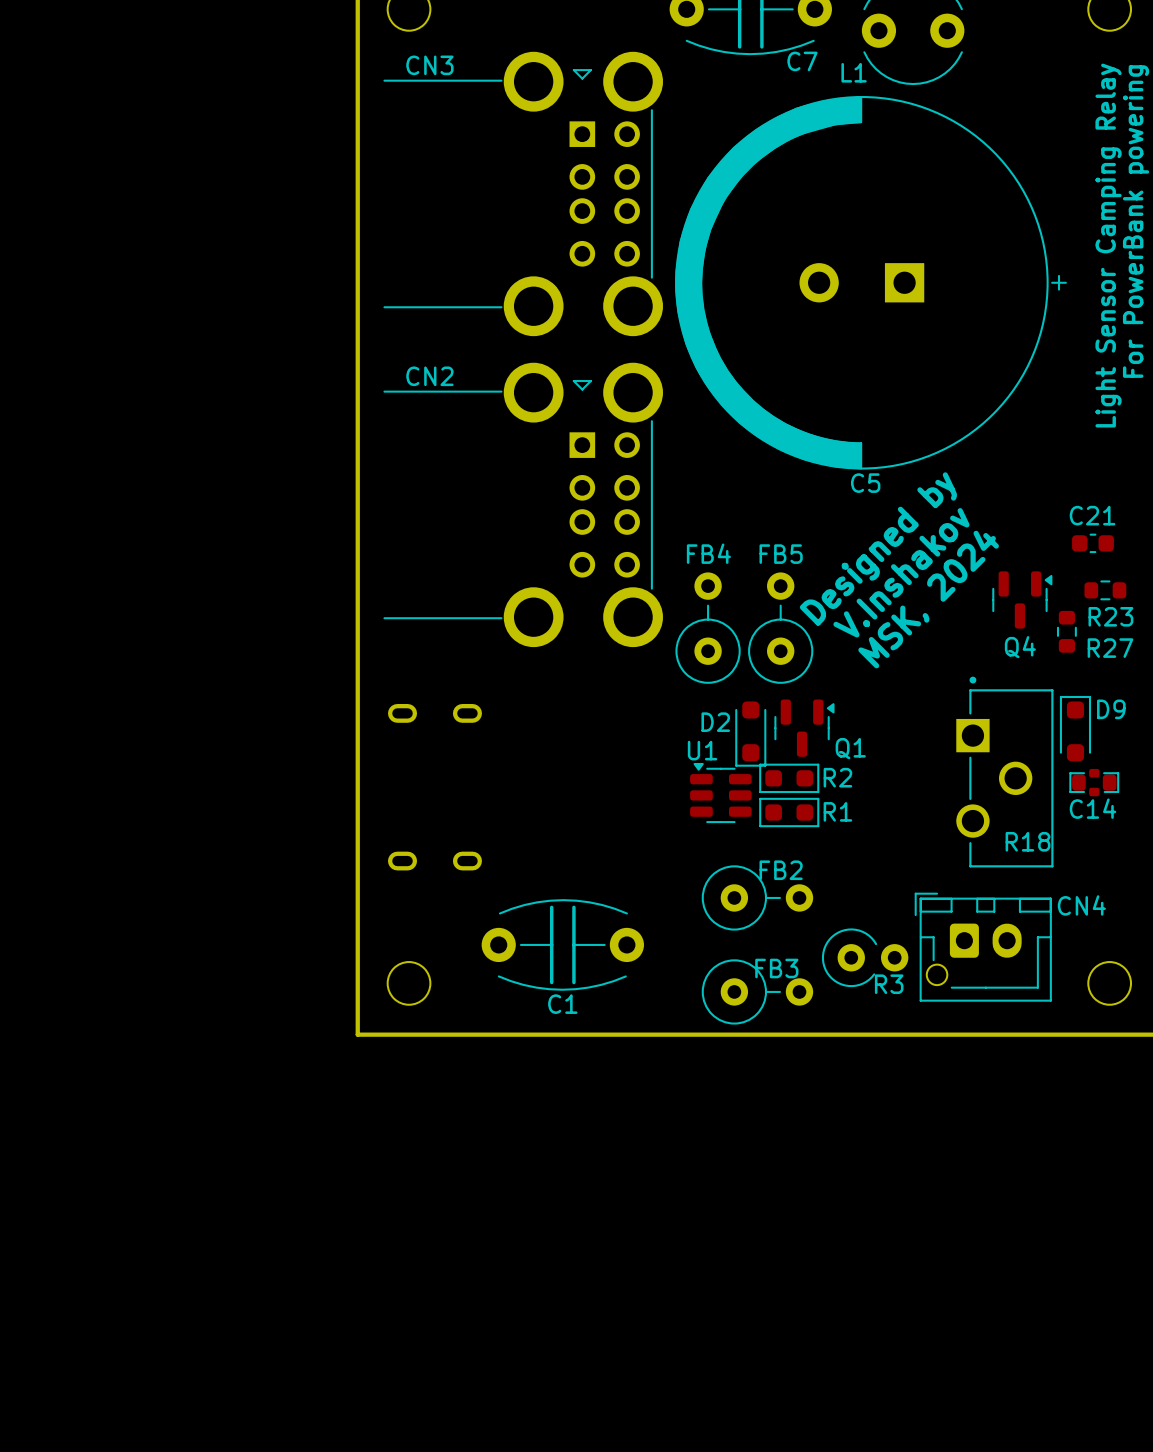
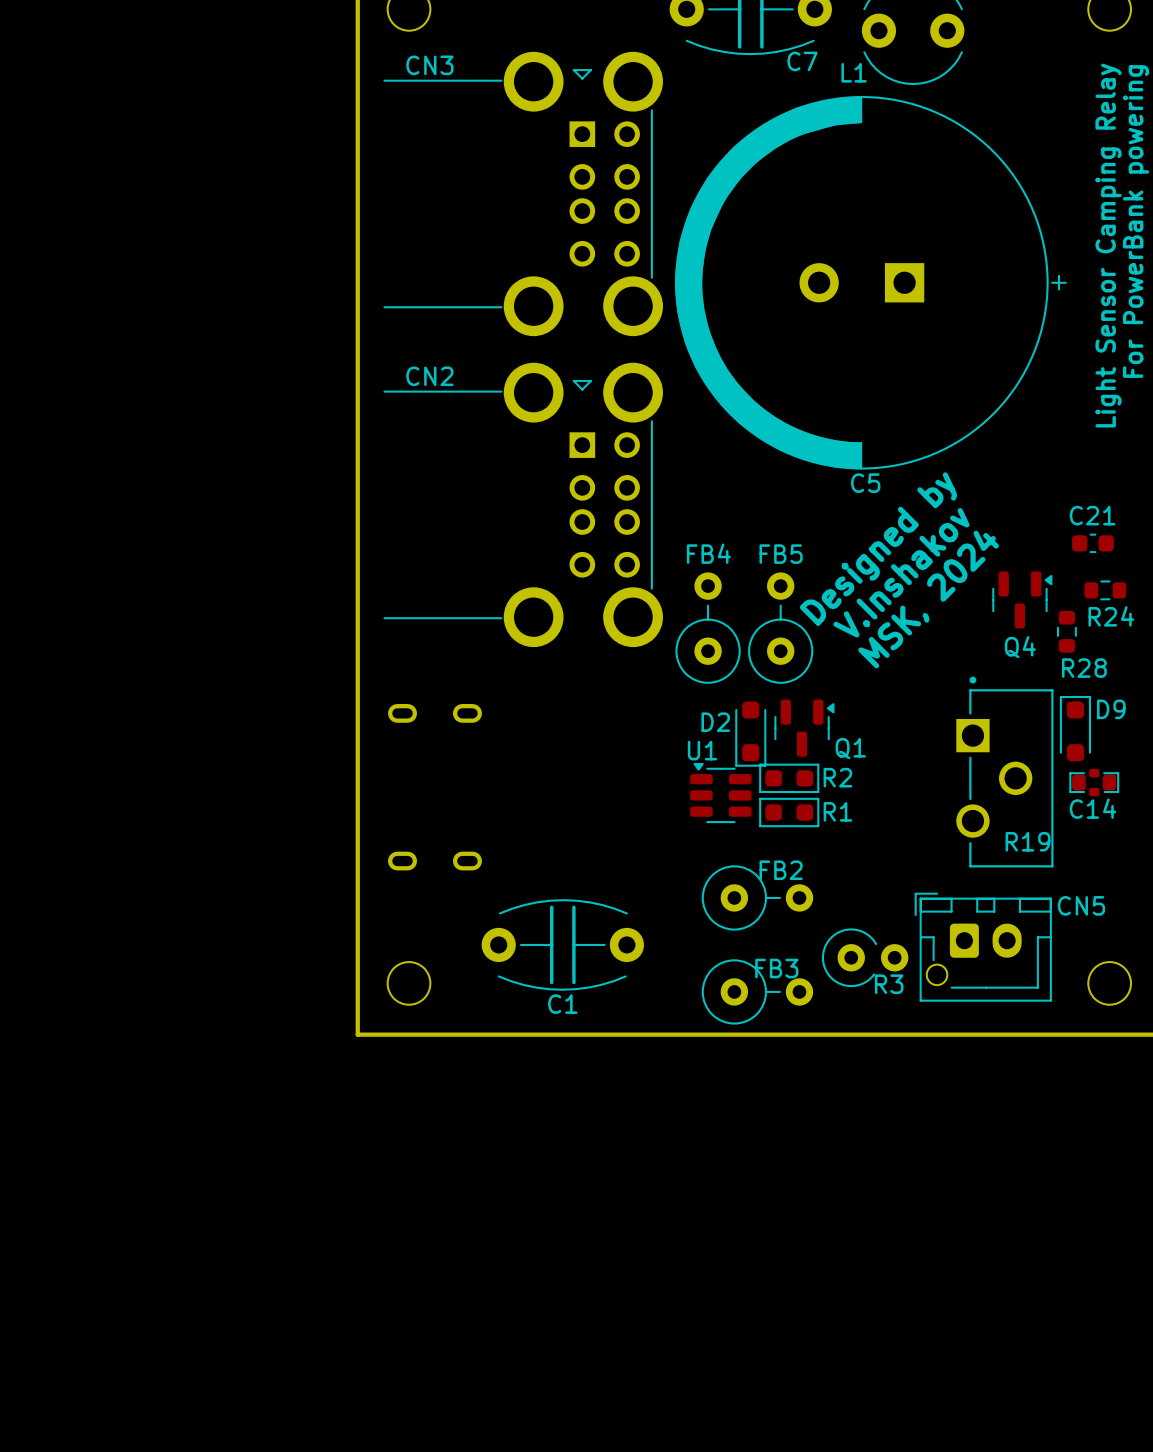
R23 name: R23 (1110, 616) -> R24 (1111, 616)
R27 name: R27 (1110, 648) -> R28 (1084, 668)
R18 name: R18 (1028, 841) -> R19 (1028, 841)
CN4 name: CN4 (1081, 905) -> CN5 (1081, 905)

